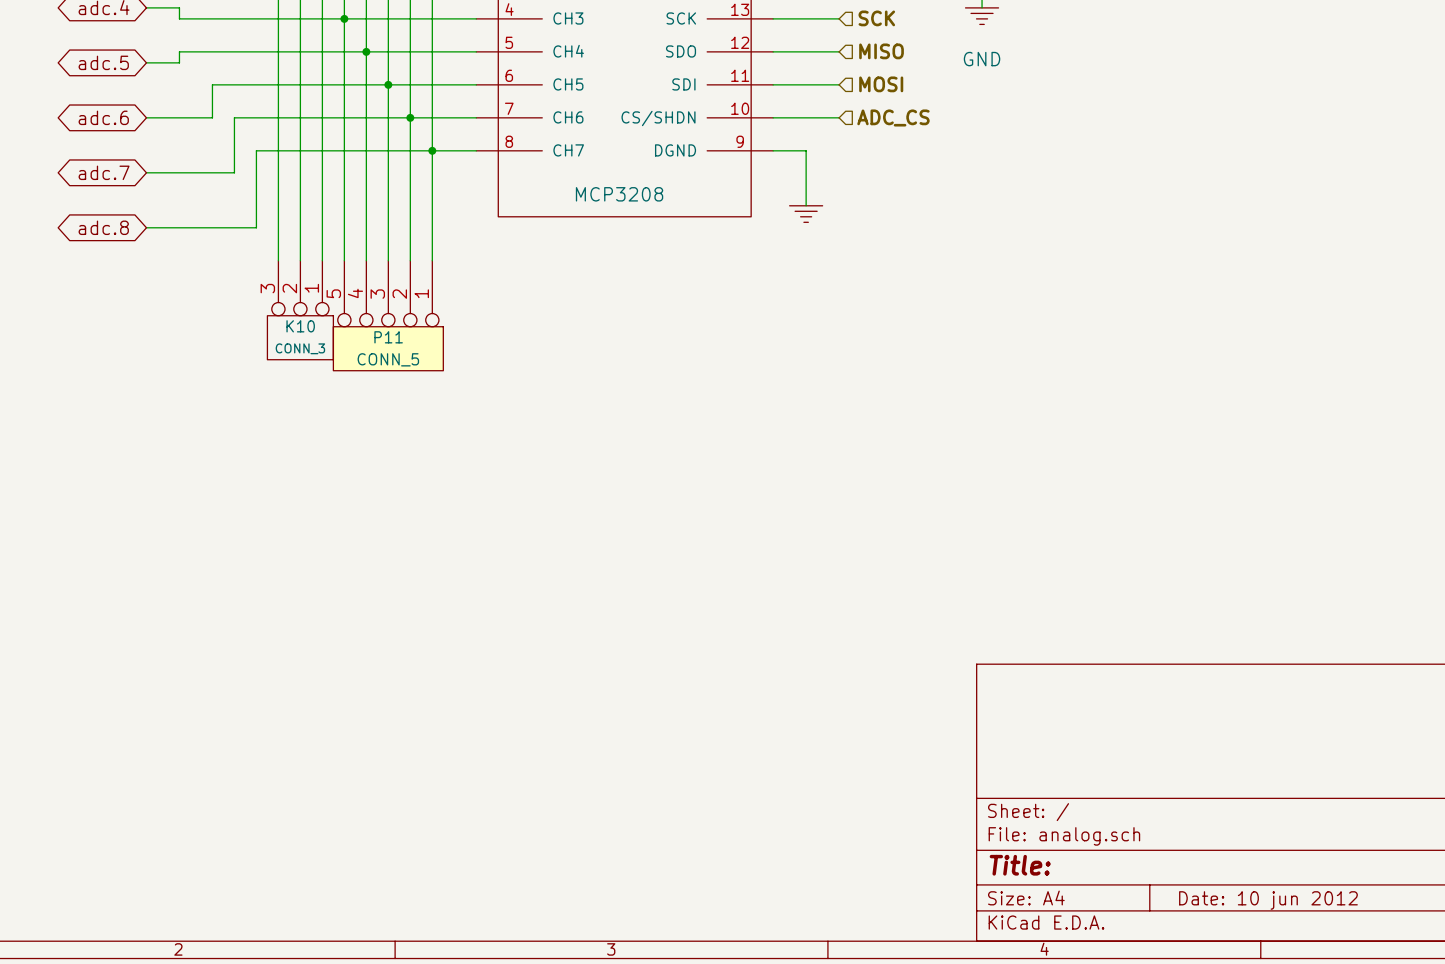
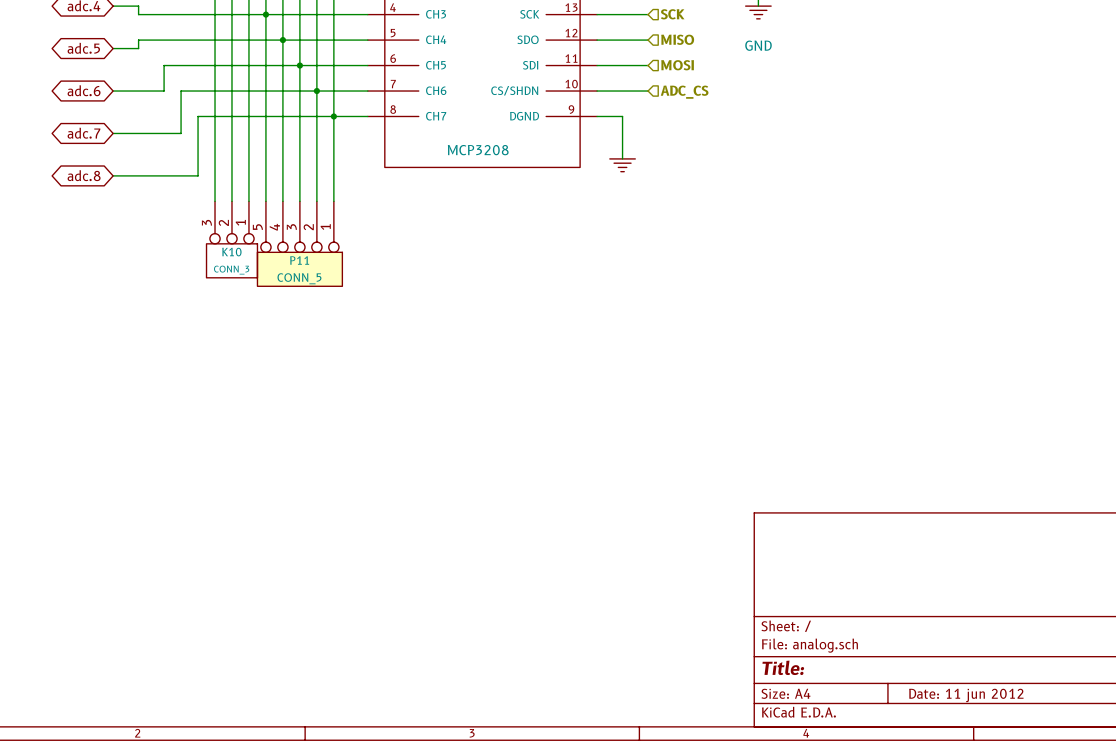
title block: Date: 10 jun 2012 (1268, 900) -> Date: 11 jun 2012 (966, 695)

